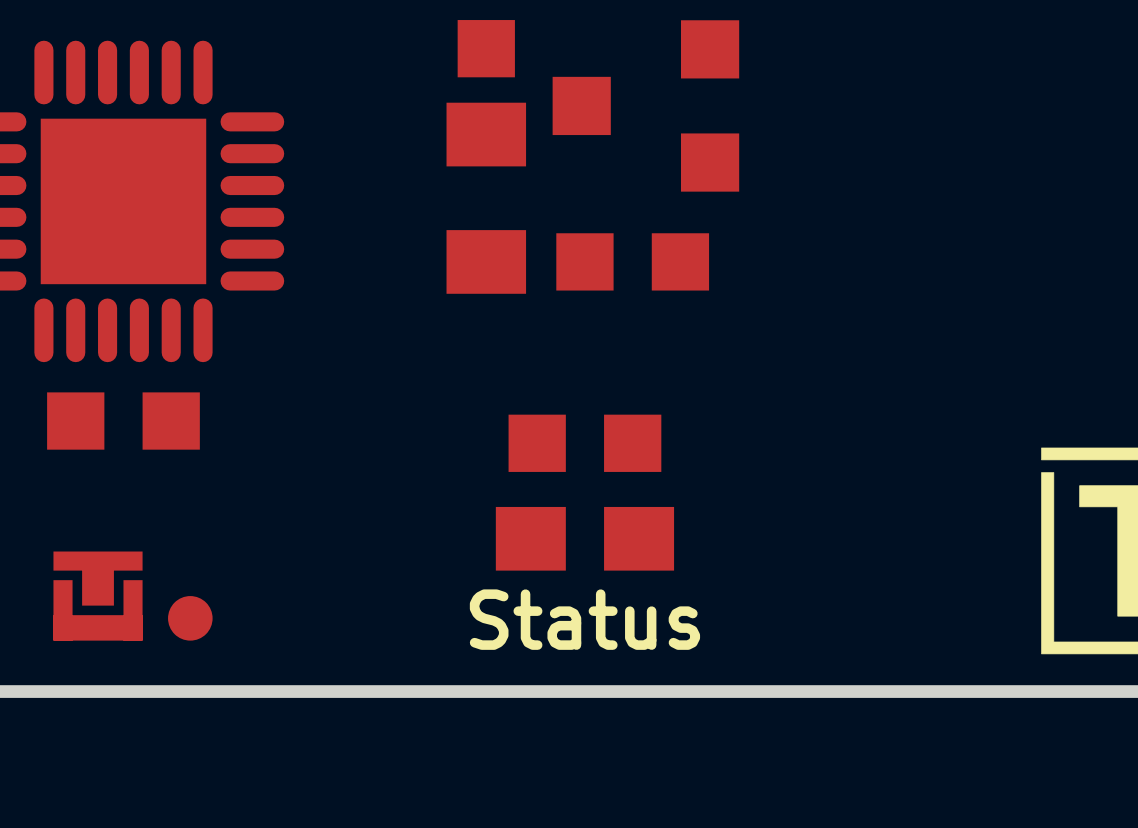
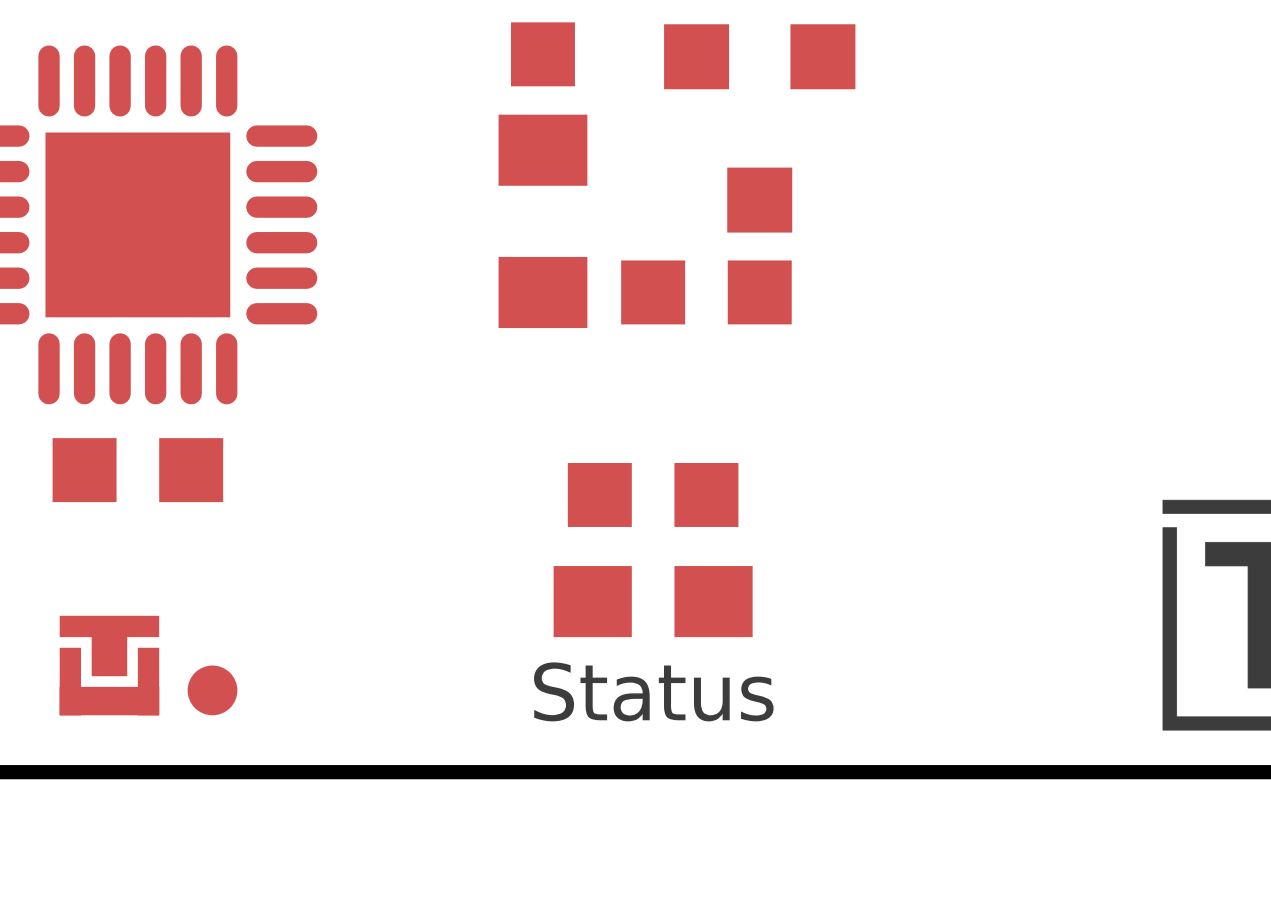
part rotation: 0° (645, 105) -> 90° counterclockwise (759, 128)

